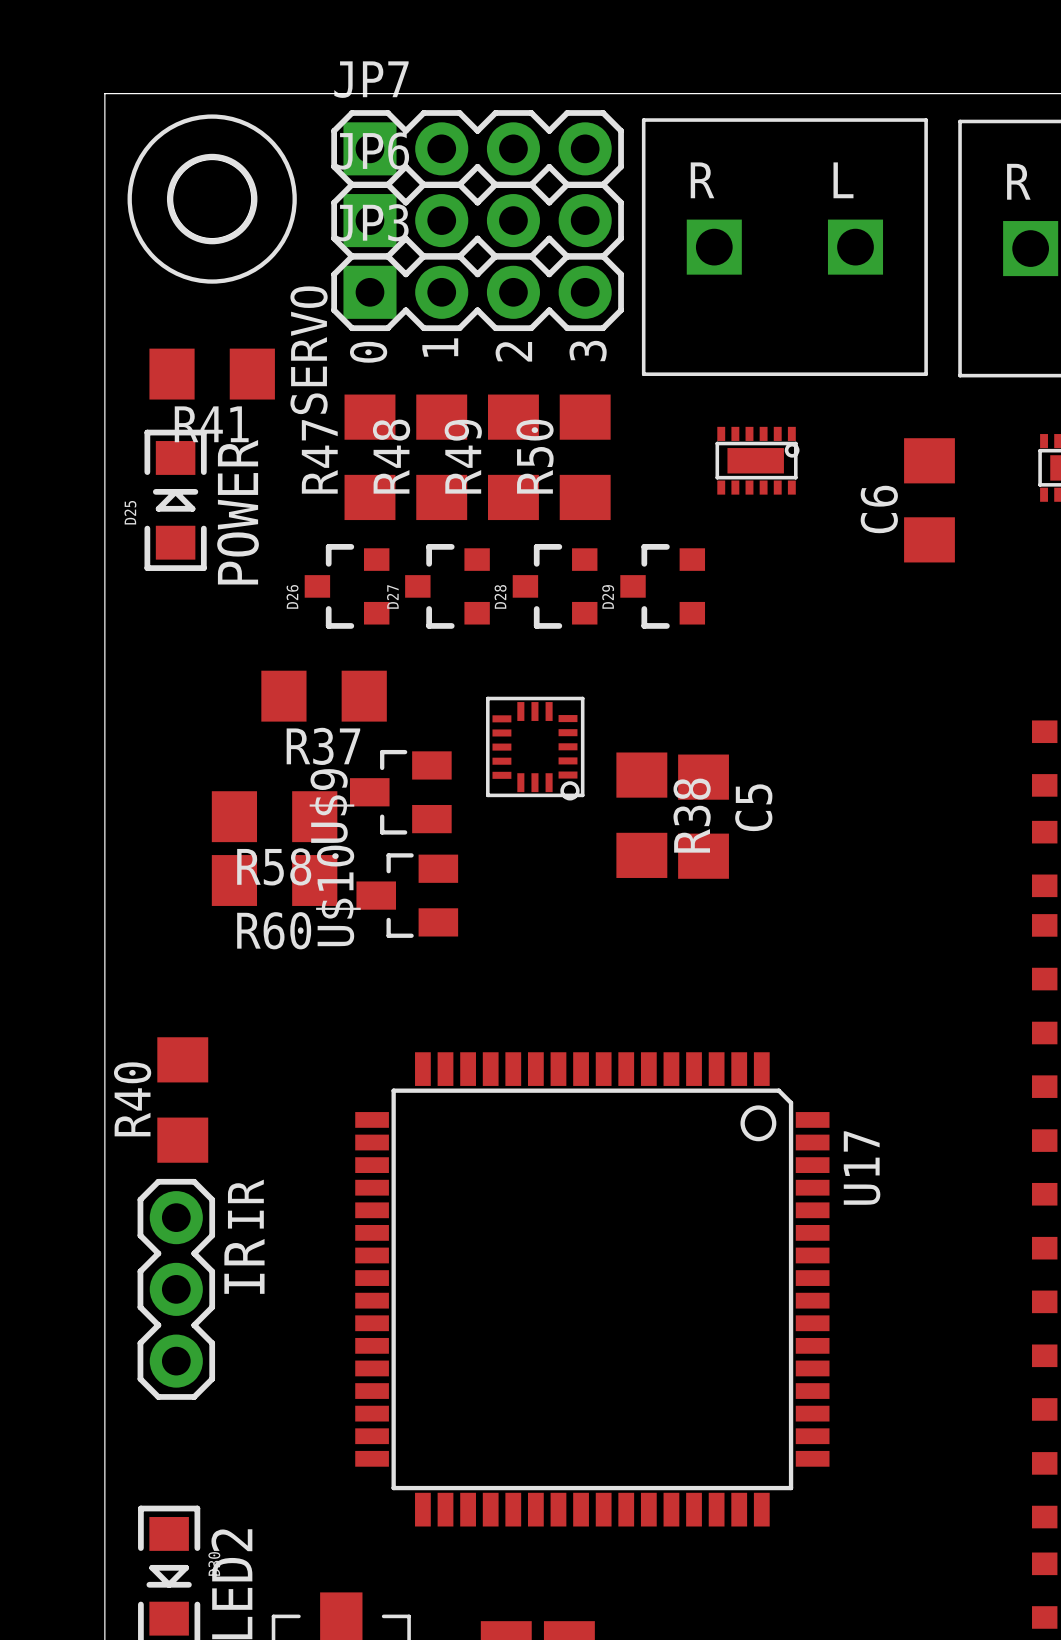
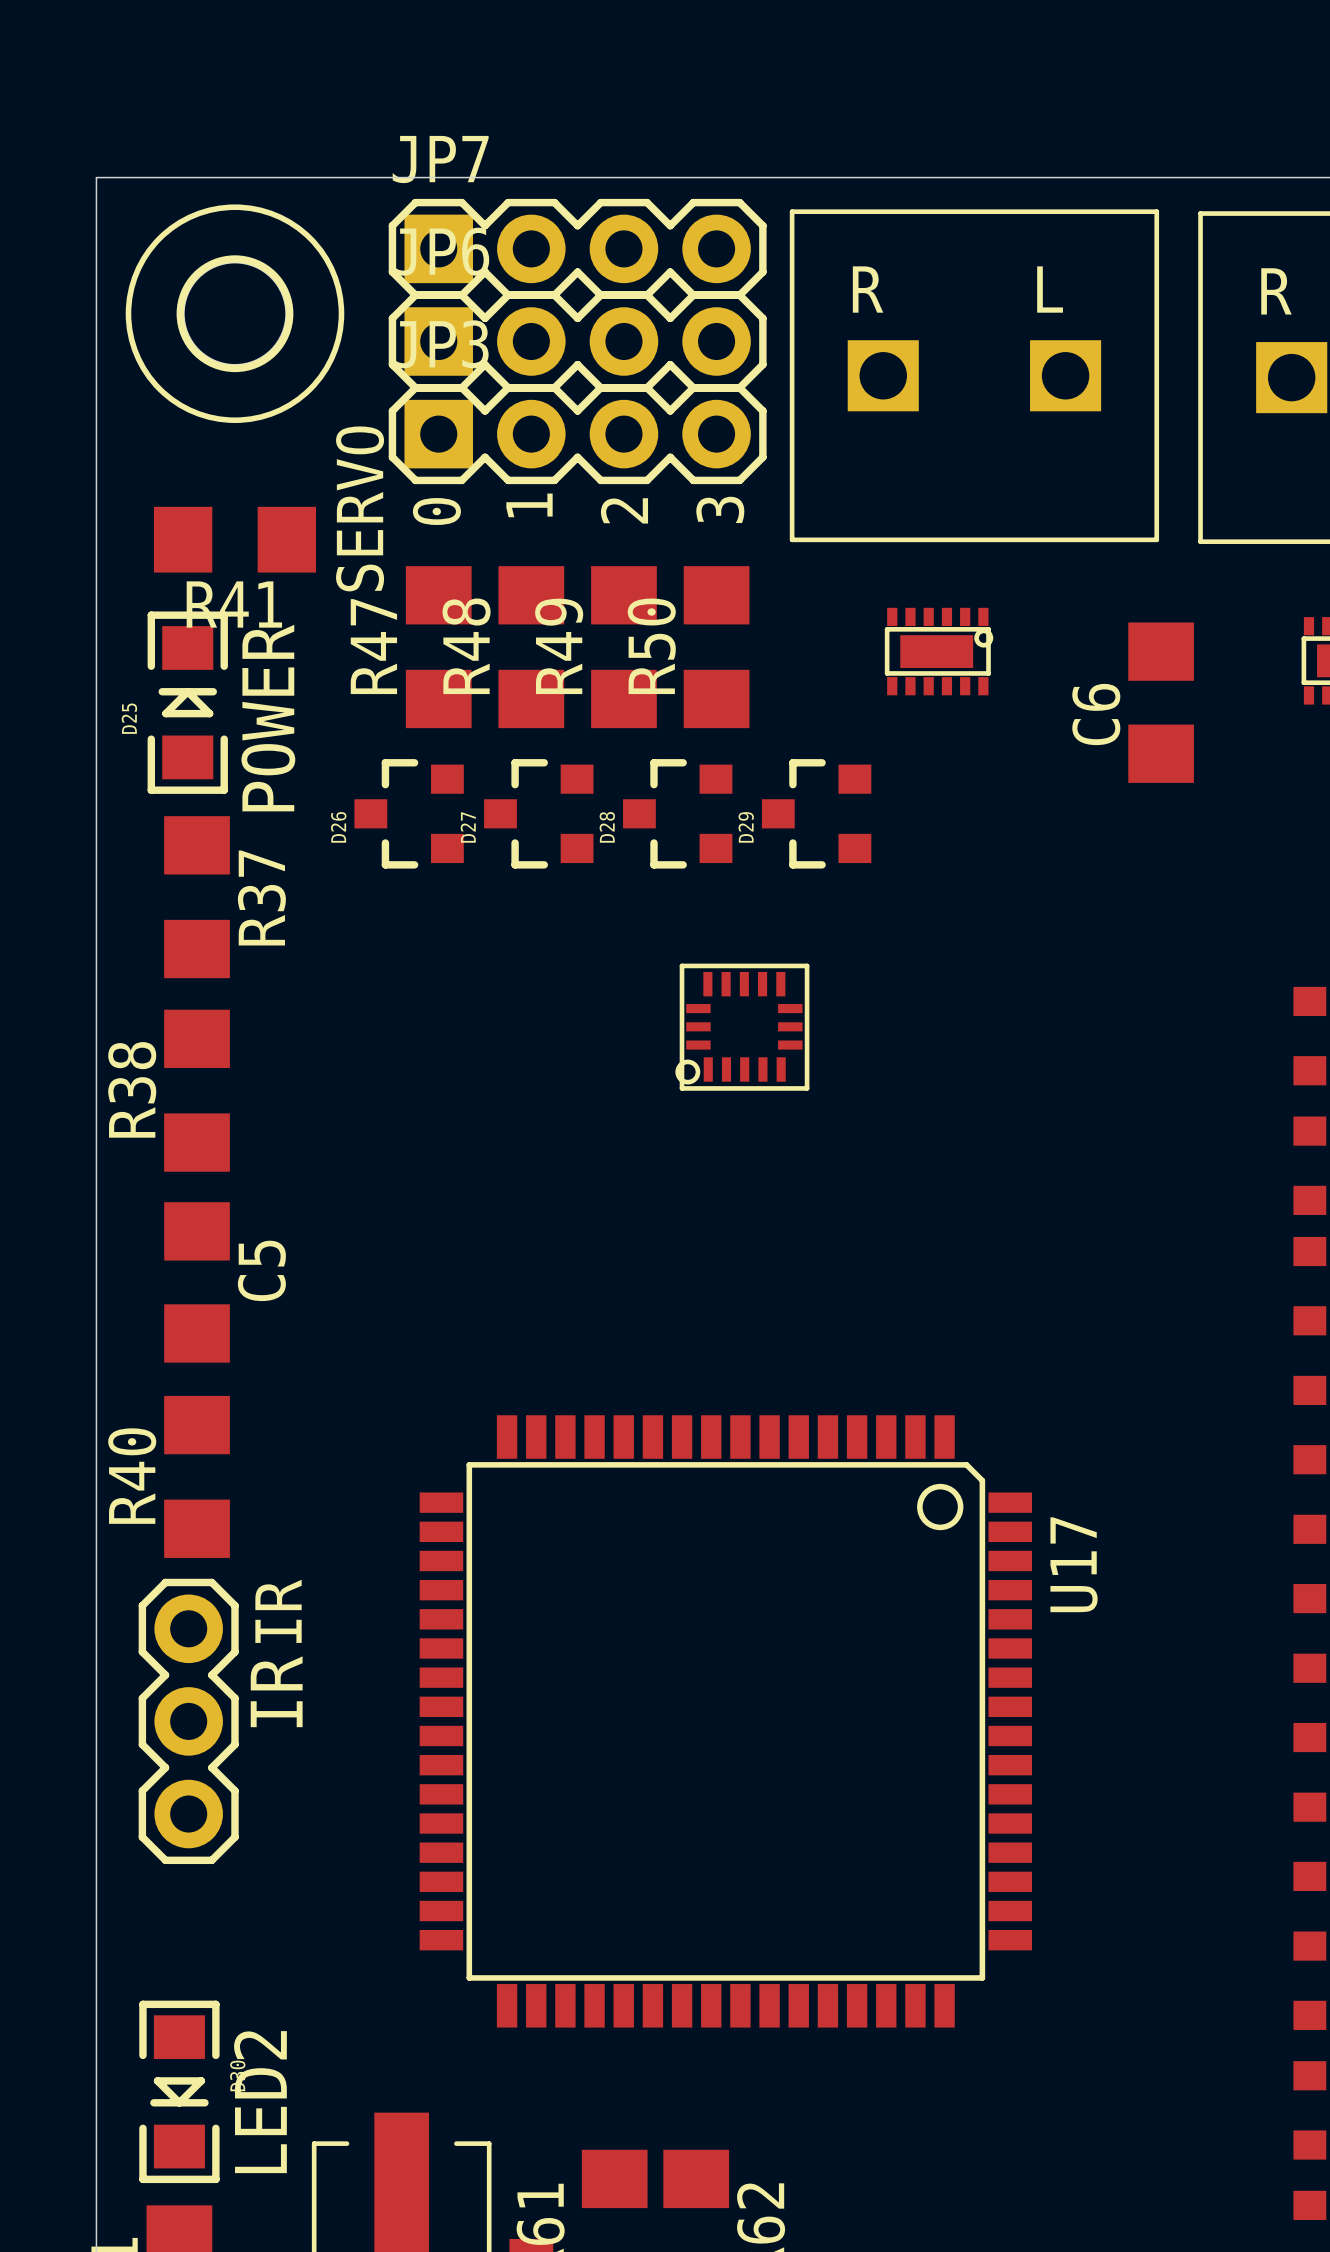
R37 rotation: 0° (324, 696) -> 90° clockwise (197, 897)
R37 position: (324, 696) -> (197, 897)
R37 name position: R37 (323, 746) -> R37 (261, 898)
part rotation: 0° (535, 748) -> 90° clockwise (742, 1027)
part position: (535, 748) -> (742, 1027)
U$9: (400, 792) -> none
R38 position: (641, 815) -> (197, 1090)
R38 name position: R38 (692, 815) -> R38 (132, 1089)
R58: (274, 816) -> none
C5 position: (703, 816) -> (197, 1282)
R60: (274, 880) -> none
U$10: (407, 895) -> none

